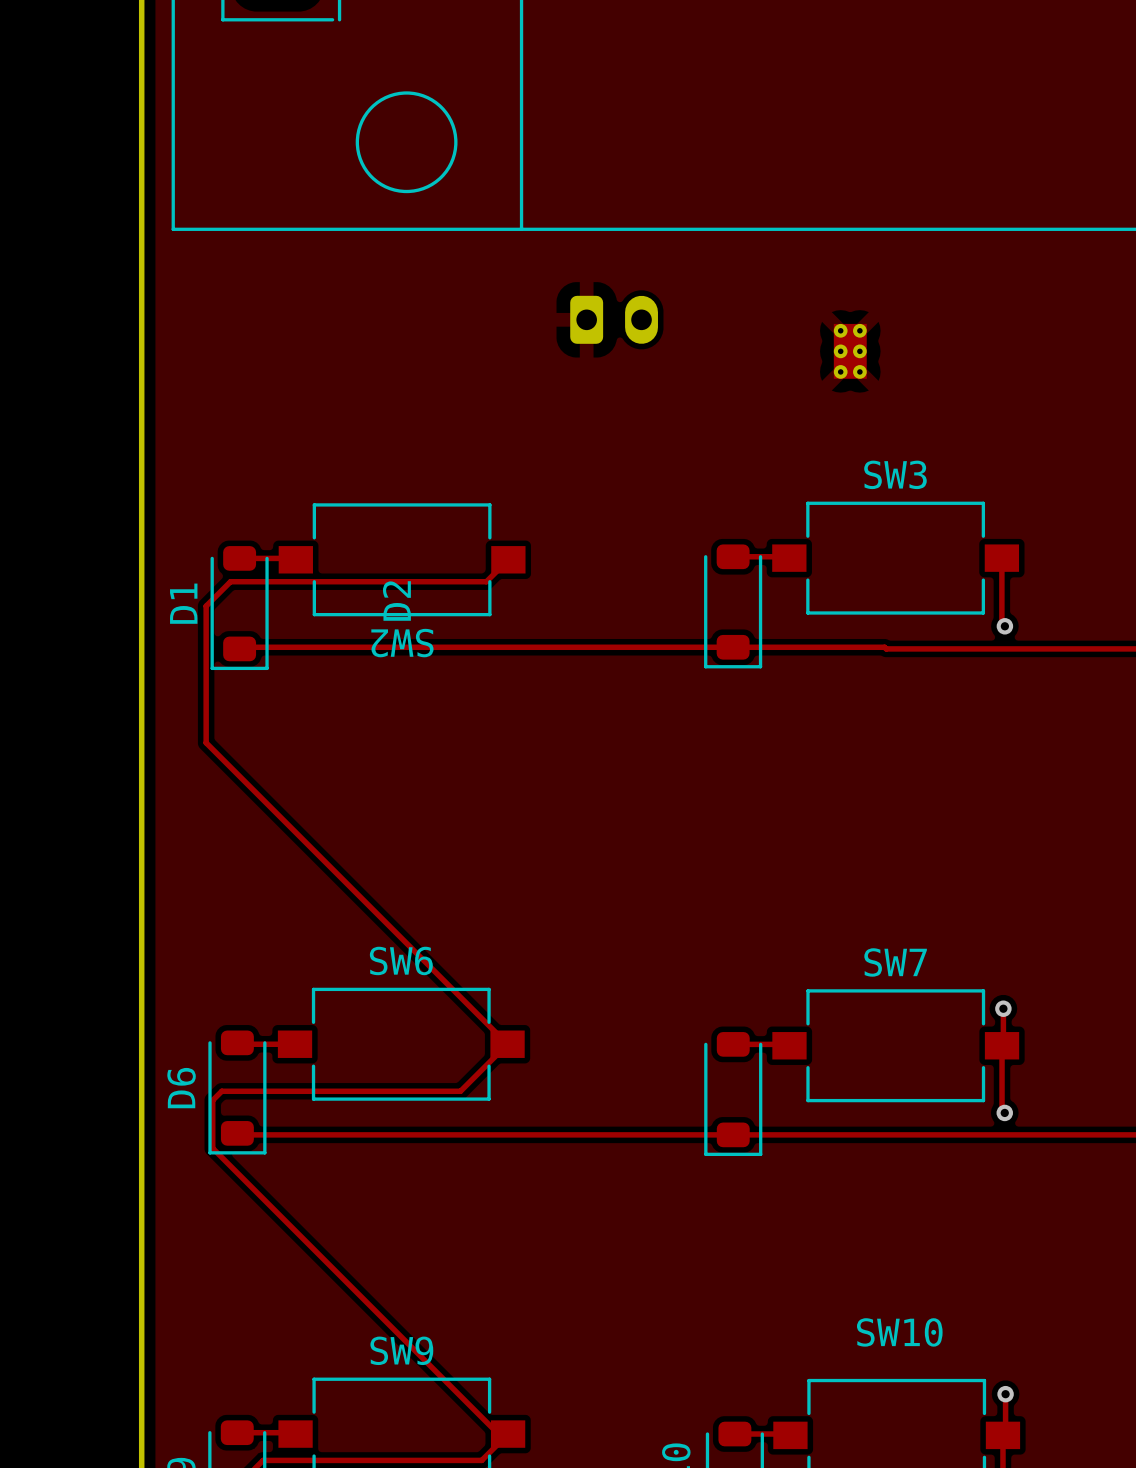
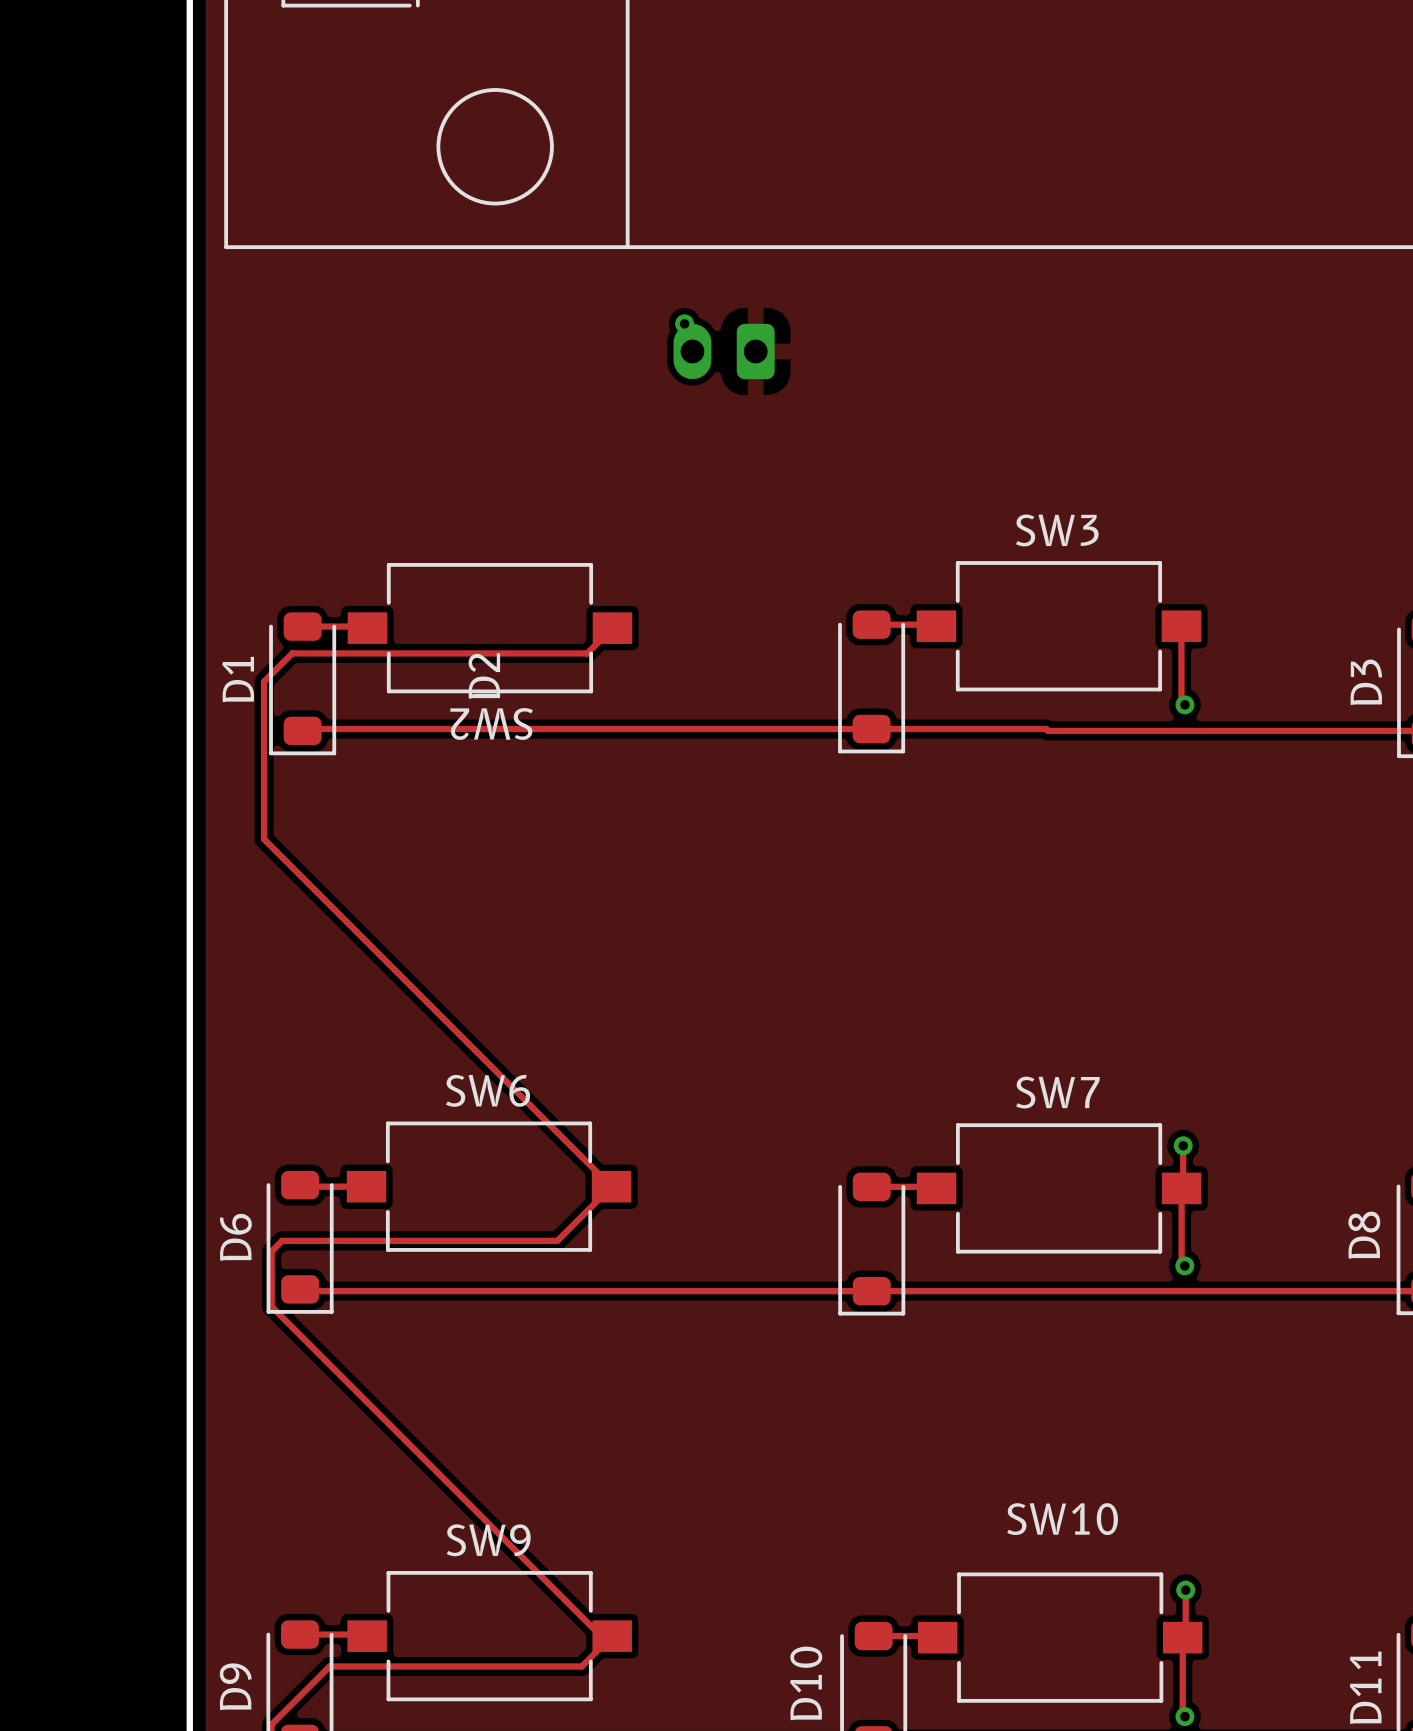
via: none -> (684, 323)
part rotation: 0° (614, 319) -> 180° (724, 351)
part: (850, 351) -> none

